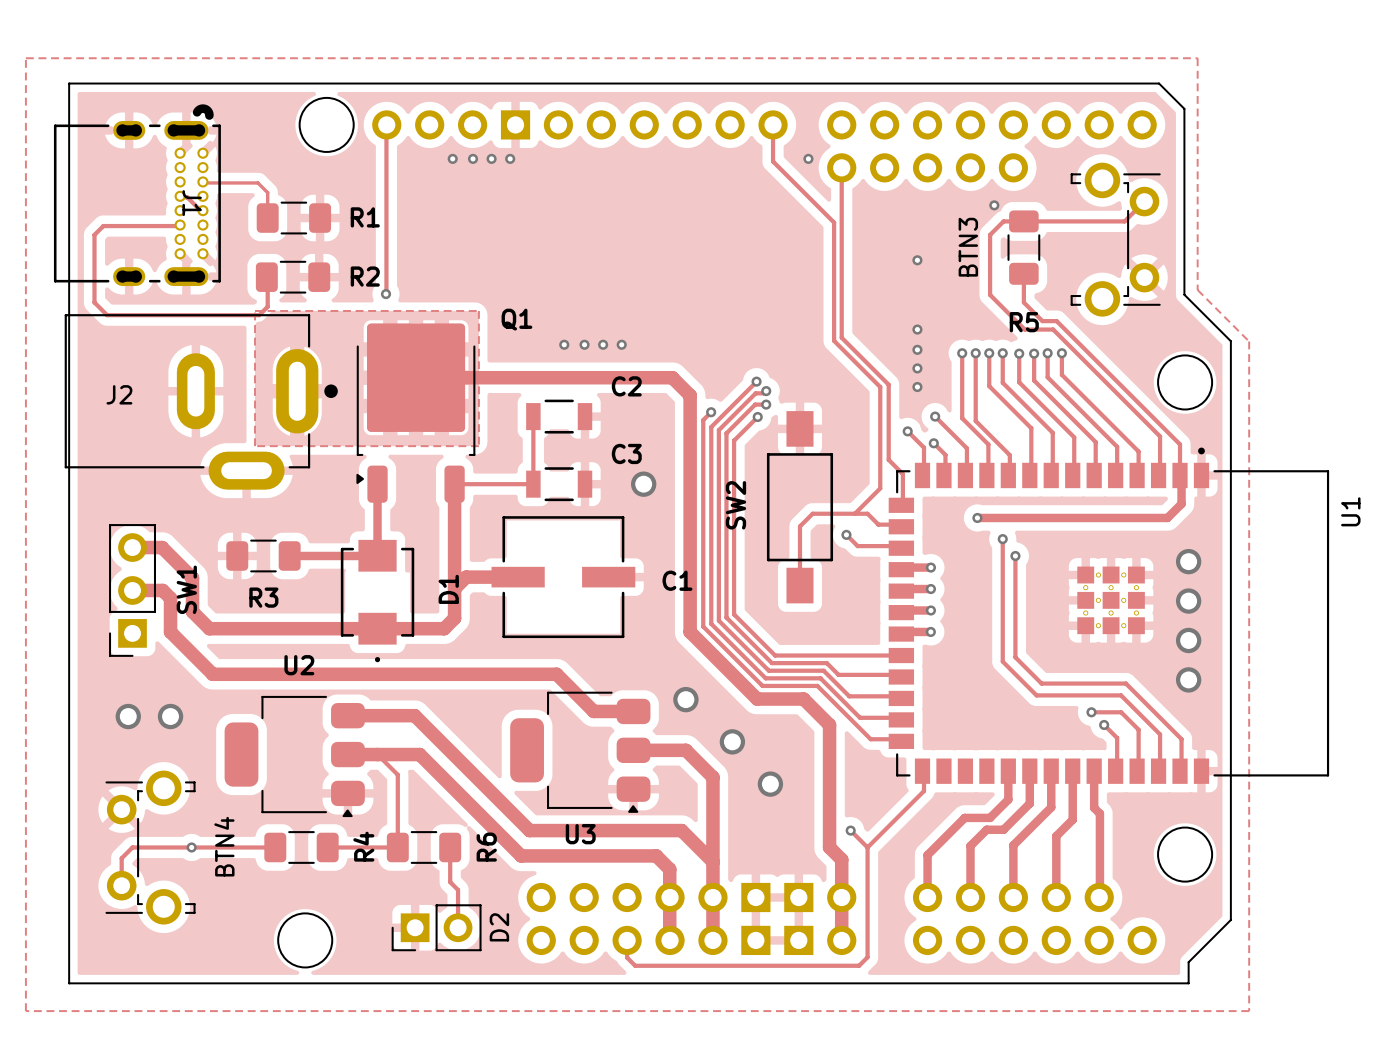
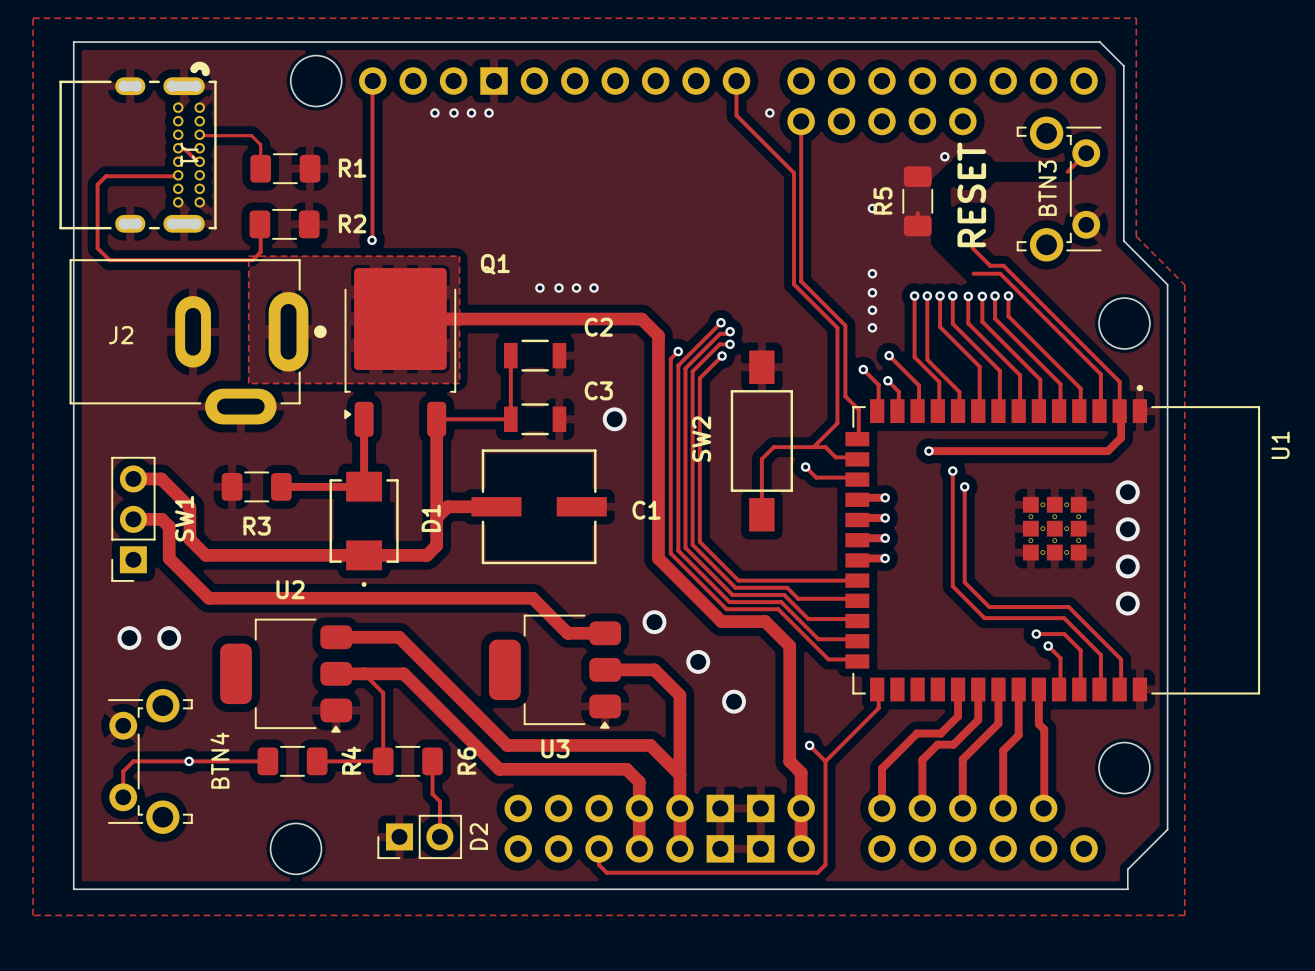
track: (1124, 221) (1003, 221) (990, 234) (990, 294) (1024, 329) -> none
text: none -> RESET (971, 194)
BTN3 name position: BTN3 (968, 247) -> BTN3 (1047, 188)
R5 position: (1023, 247) -> (917, 201)
track: none -> (917, 213) (917, 218)
track: (1023, 273) (1023, 302) -> none
R5 name rotation: 0° (1024, 322) -> 90° counterclockwise (882, 200)
R5 name position: R5 (1024, 322) -> R5 (882, 200)

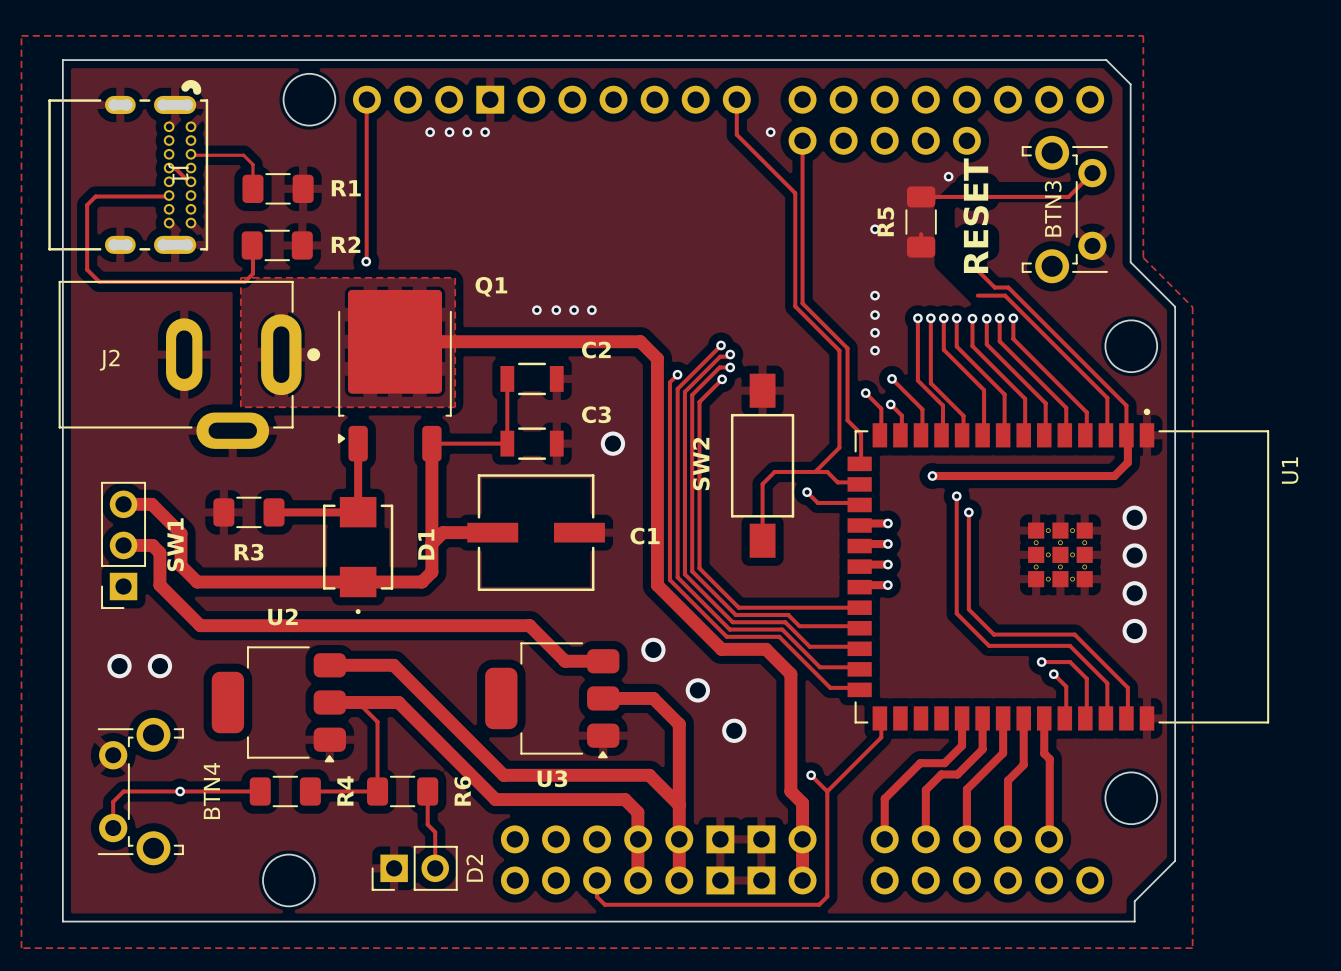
track: none -> (1073, 192) (1068, 196) (921, 196)

